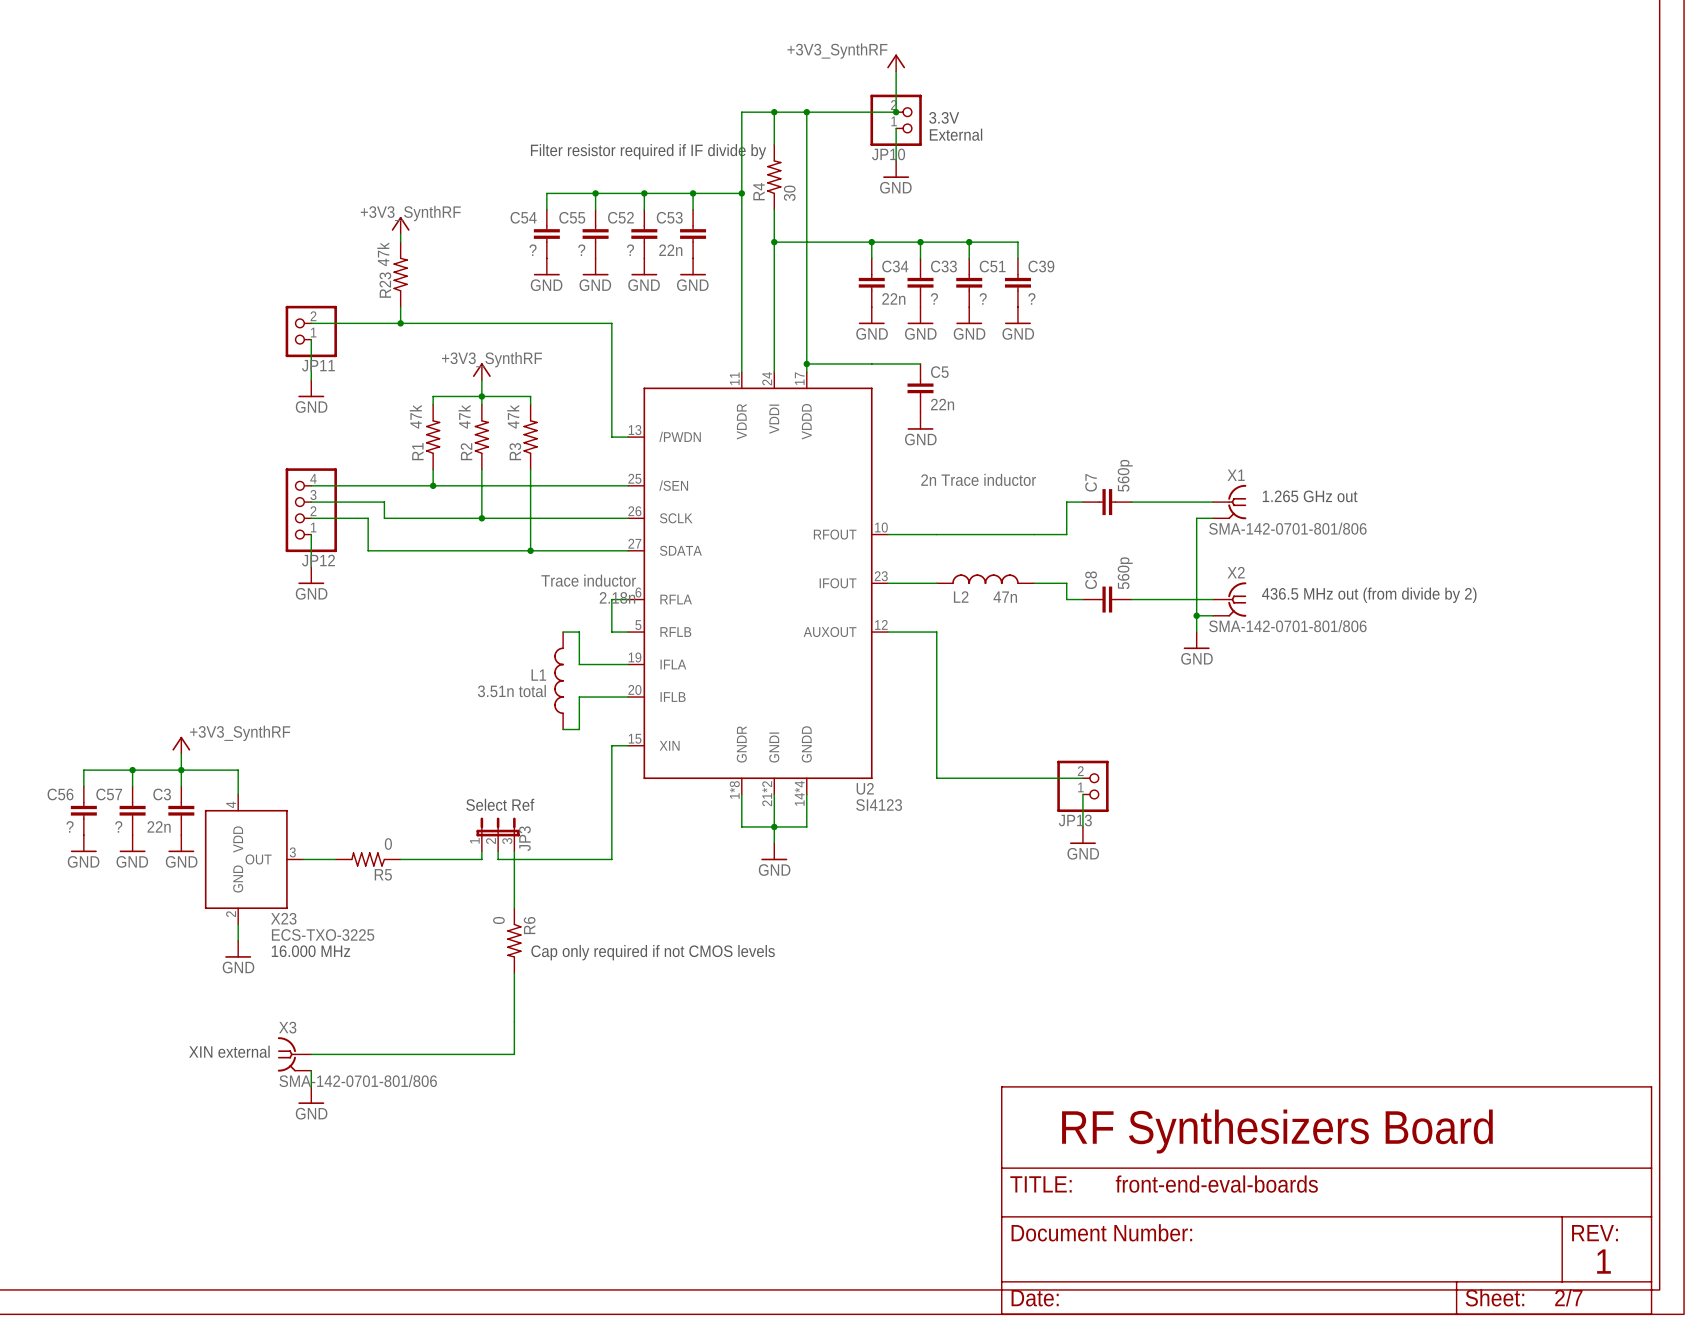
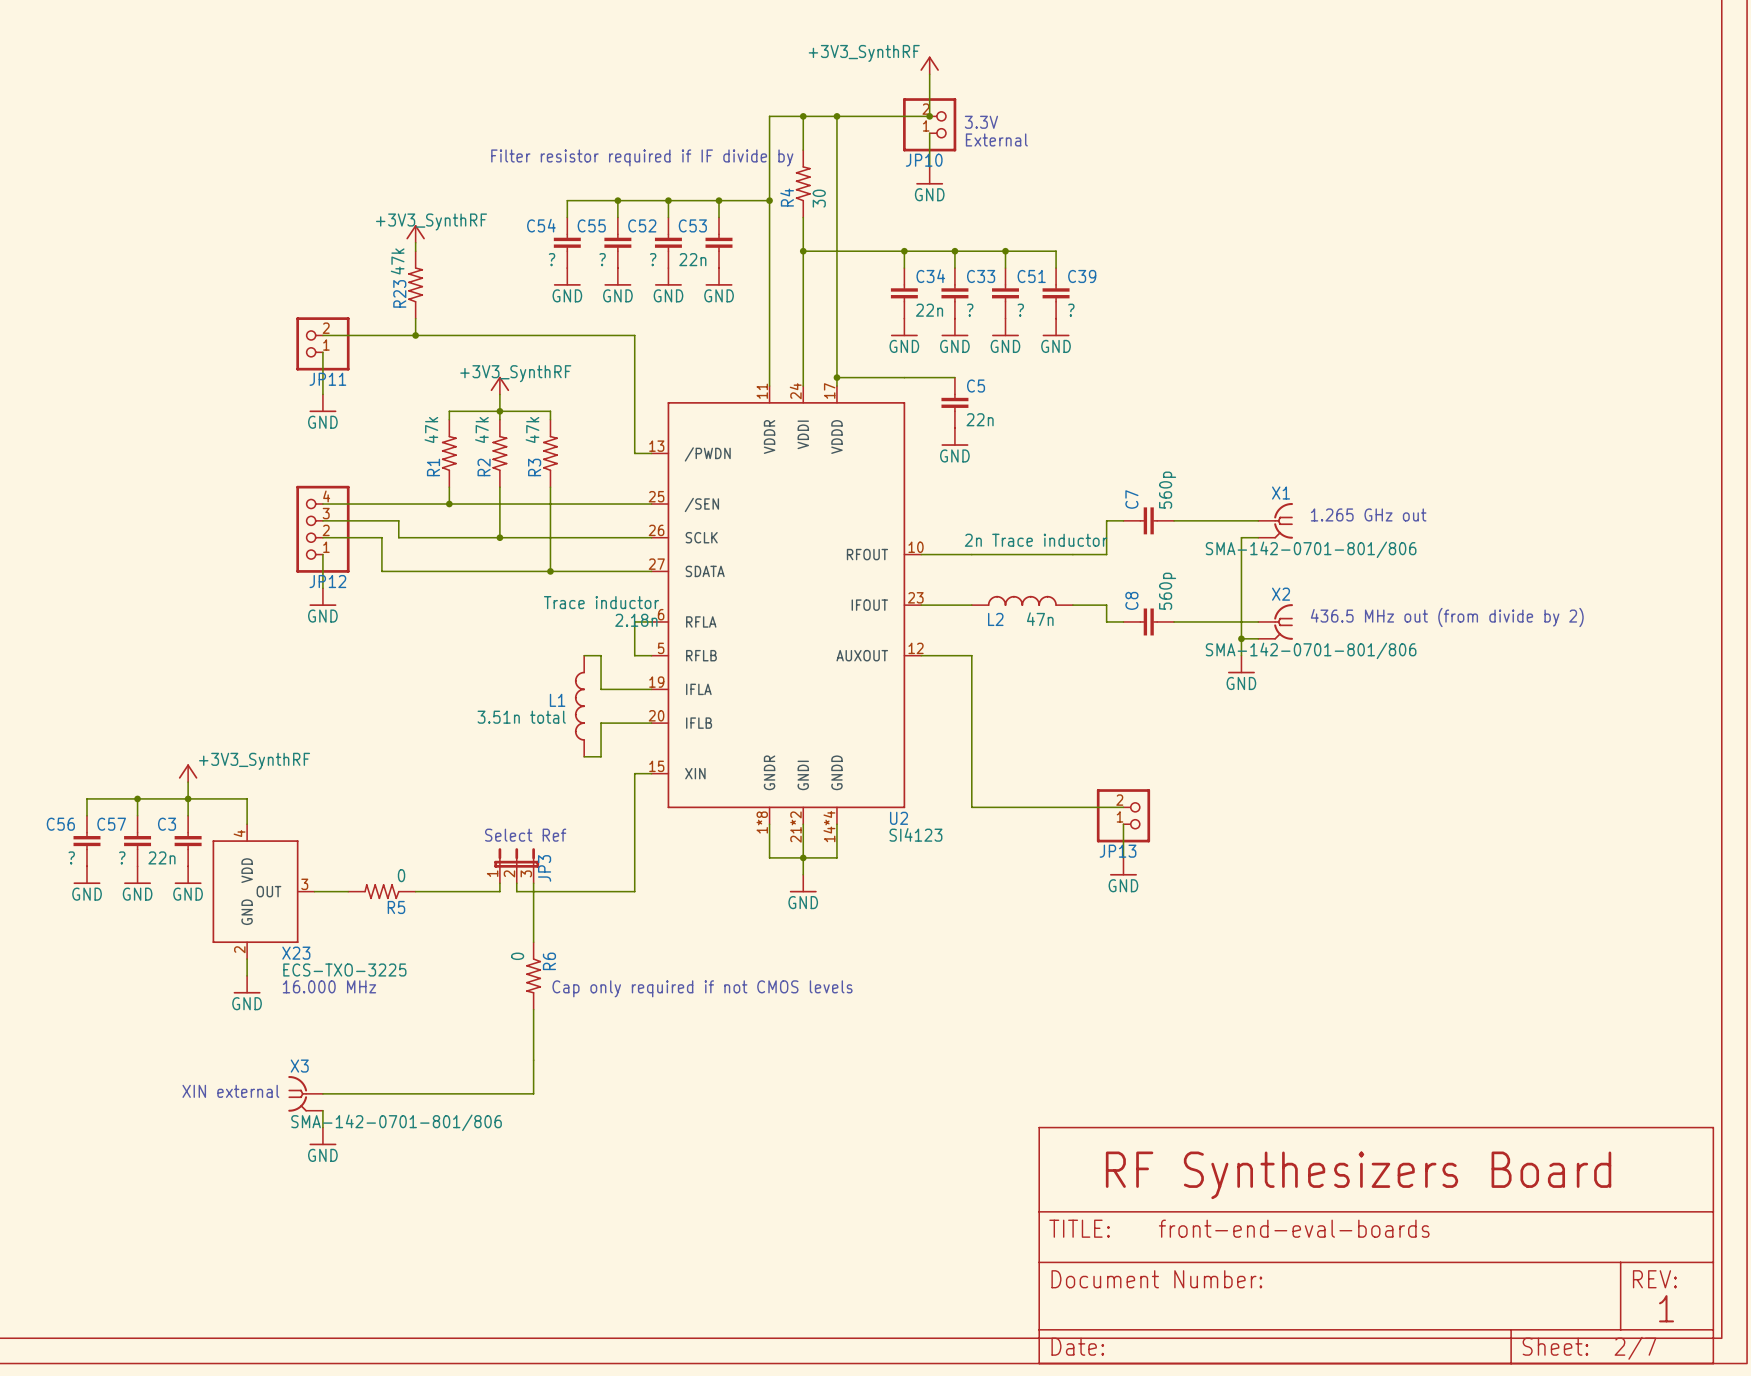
text position: 2n Trace inductor (978, 479) -> 2n Trace inductor (1036, 540)

